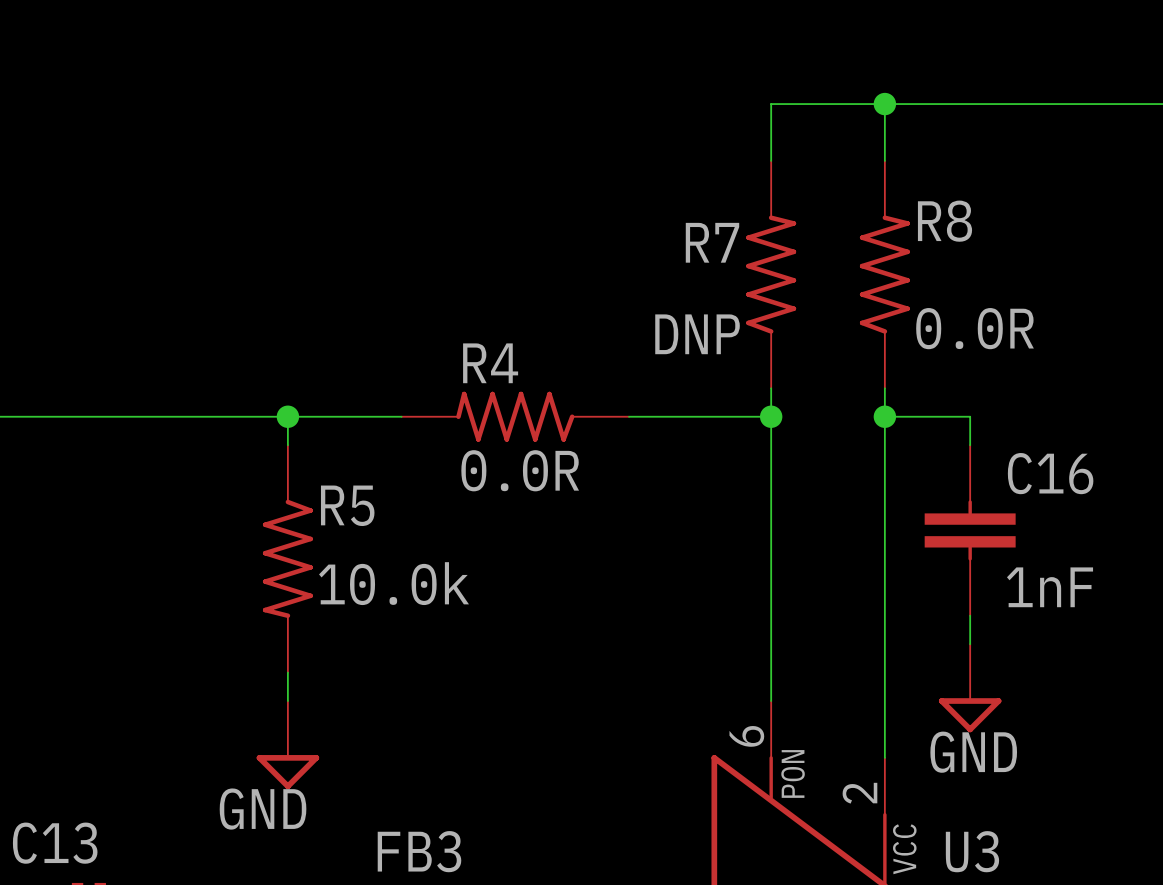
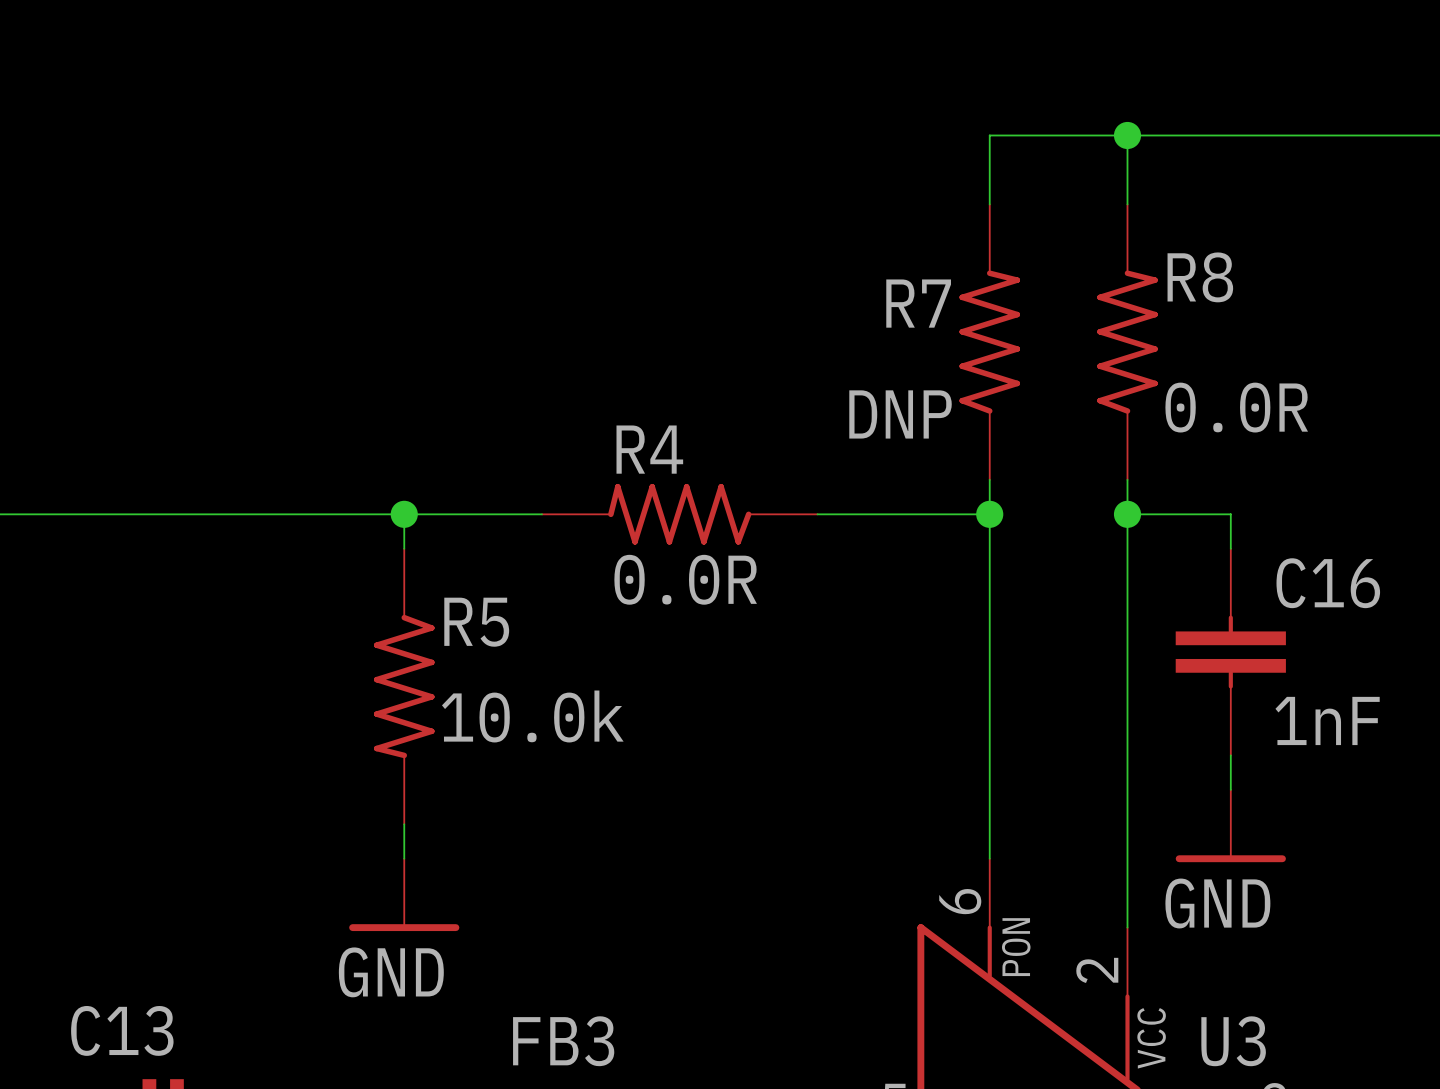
power symbol shape: [938, 644, 1002, 733] -> [1175, 789, 1286, 863]
power symbol shape: [256, 701, 320, 790] -> [349, 858, 460, 932]

